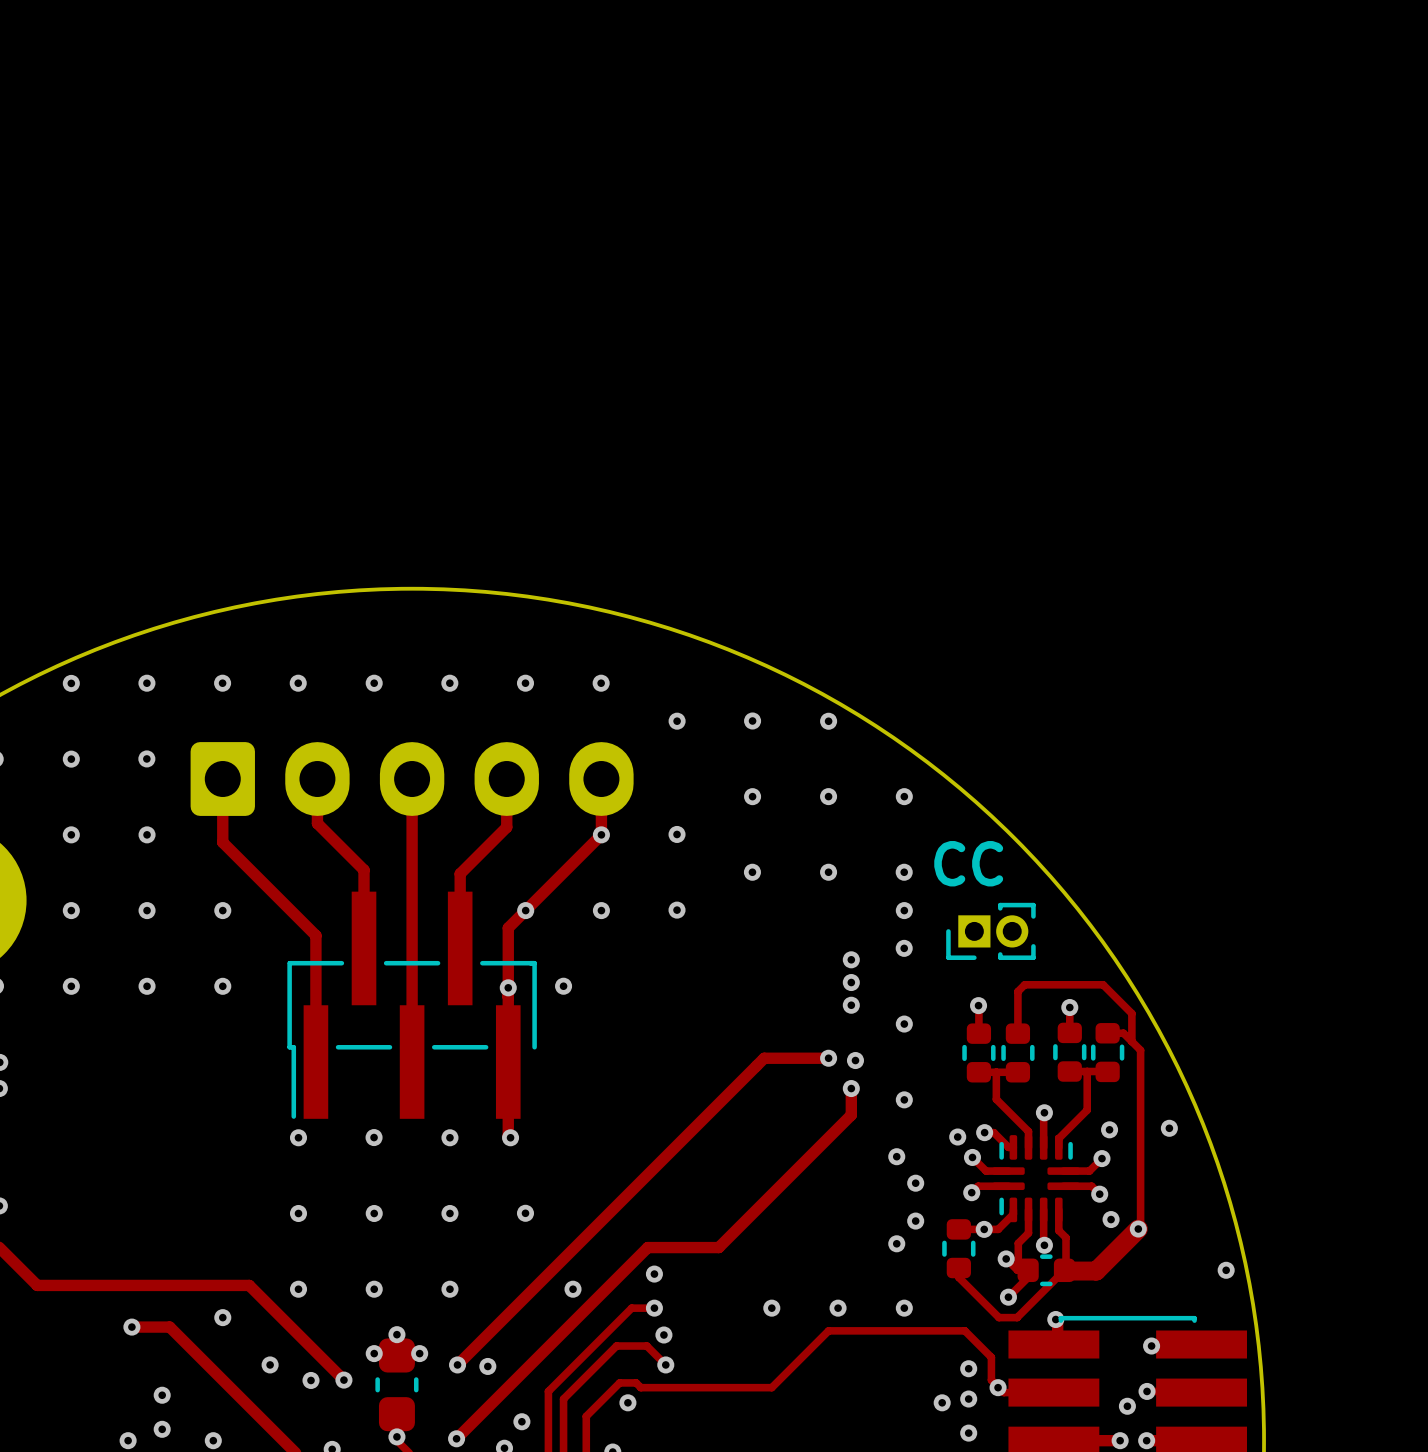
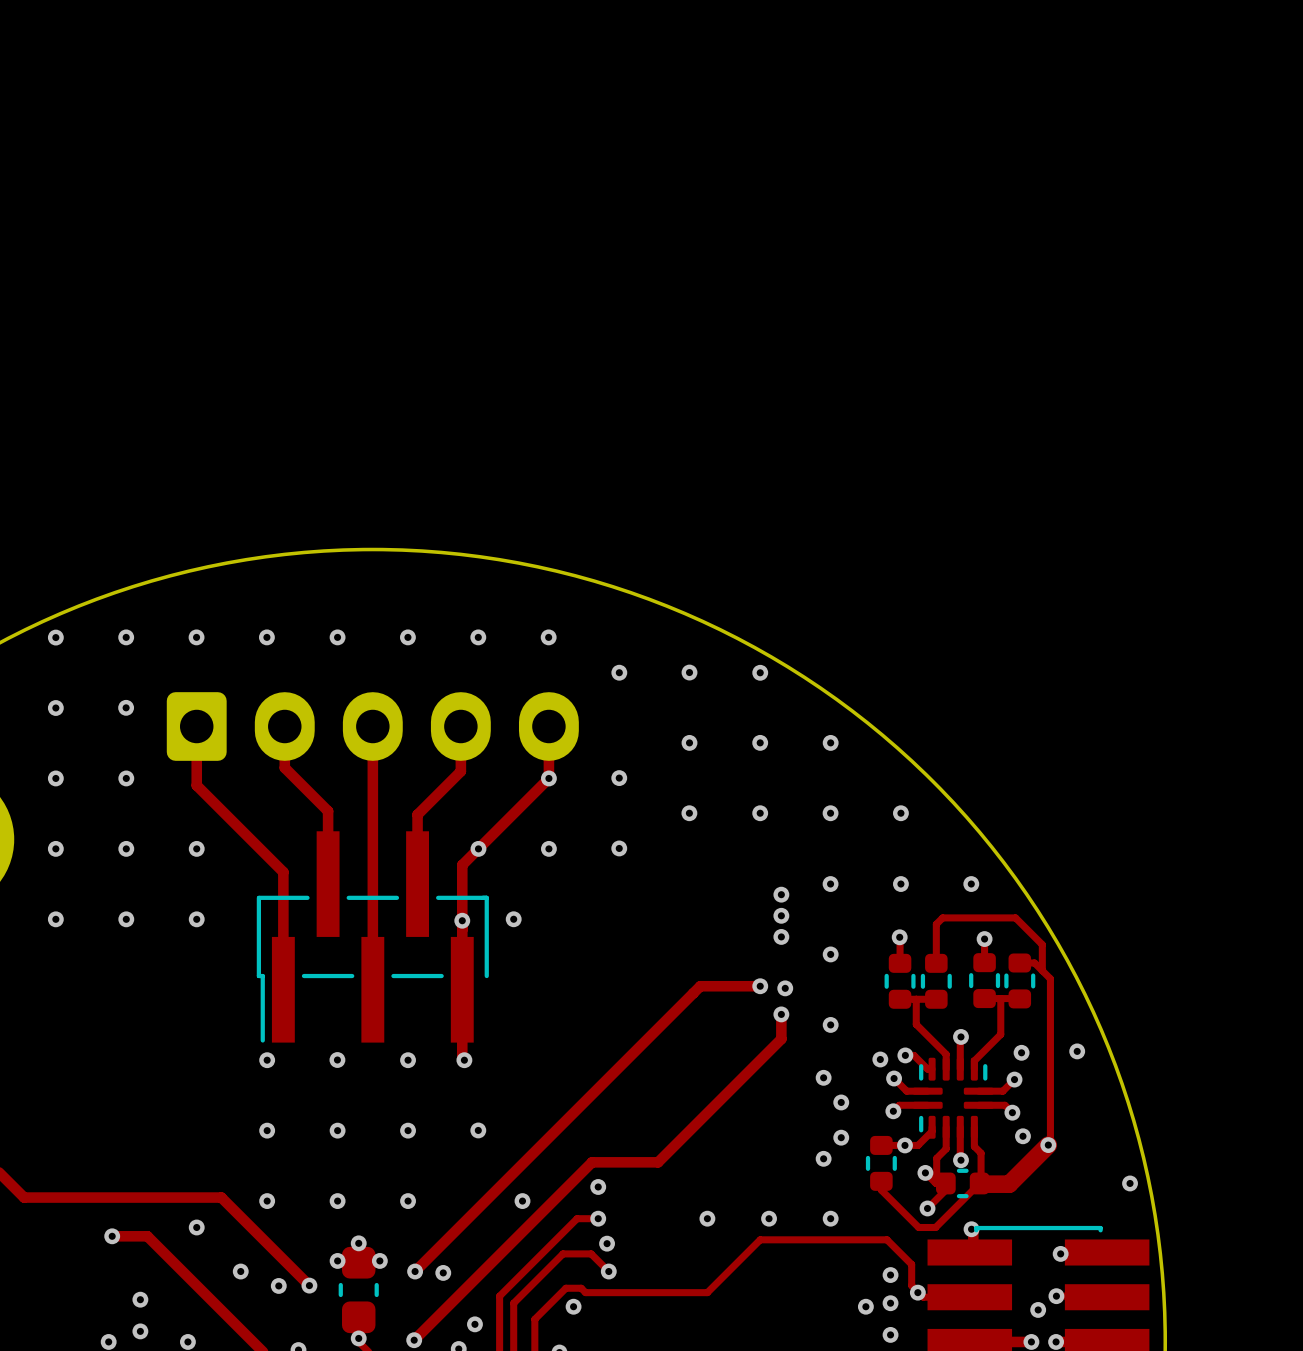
text: CC (968, 863) -> none
via: none -> (900, 813)
via: (904, 910) -> none
part: (990, 931) -> none
via: none -> (900, 884)
via: none -> (971, 884)

